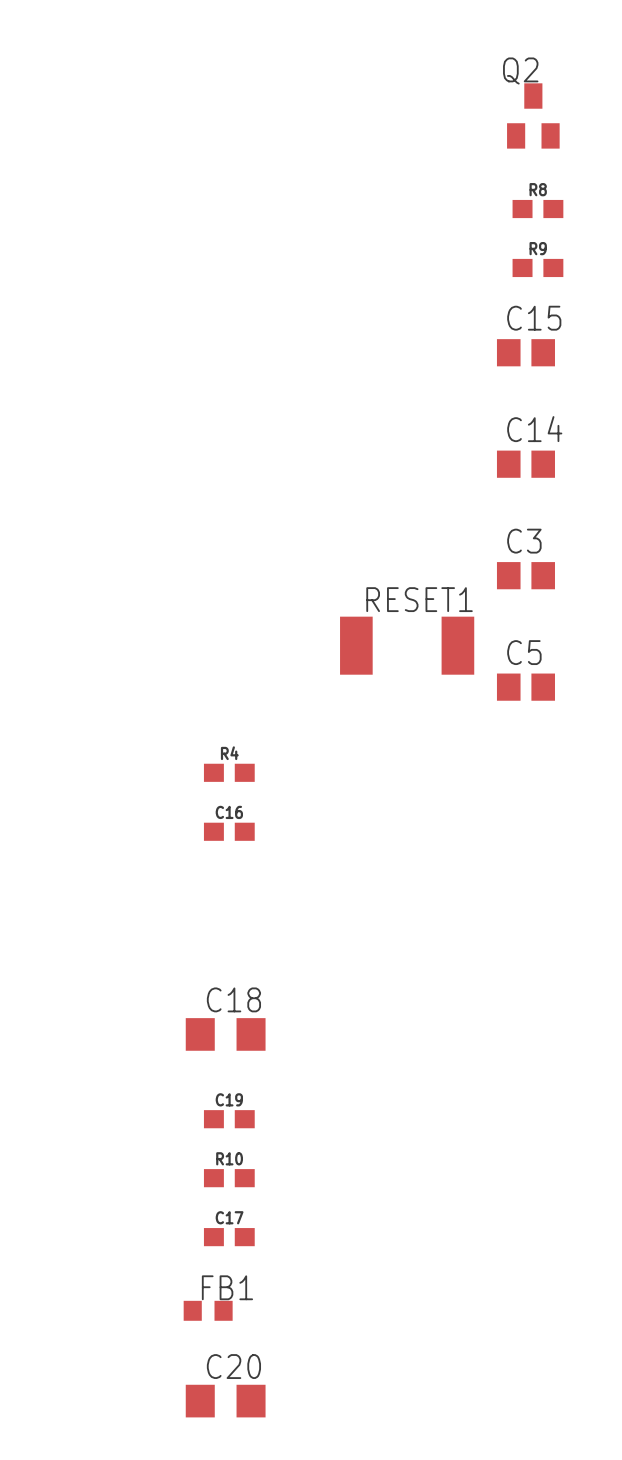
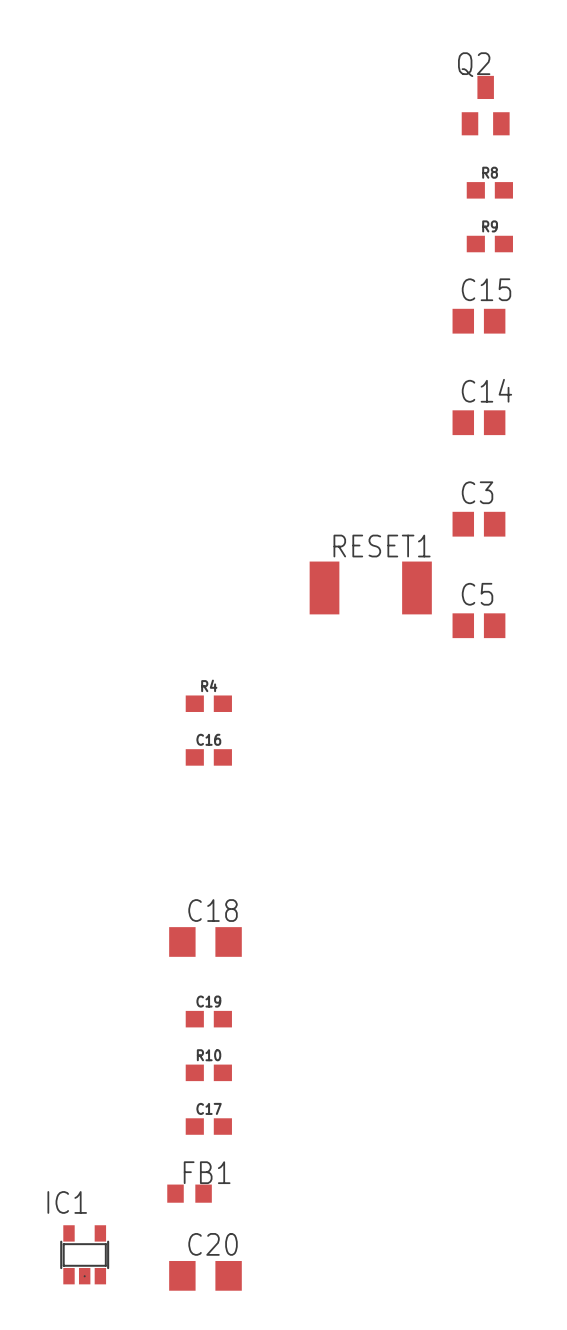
IC1: none -> (84, 1254)

